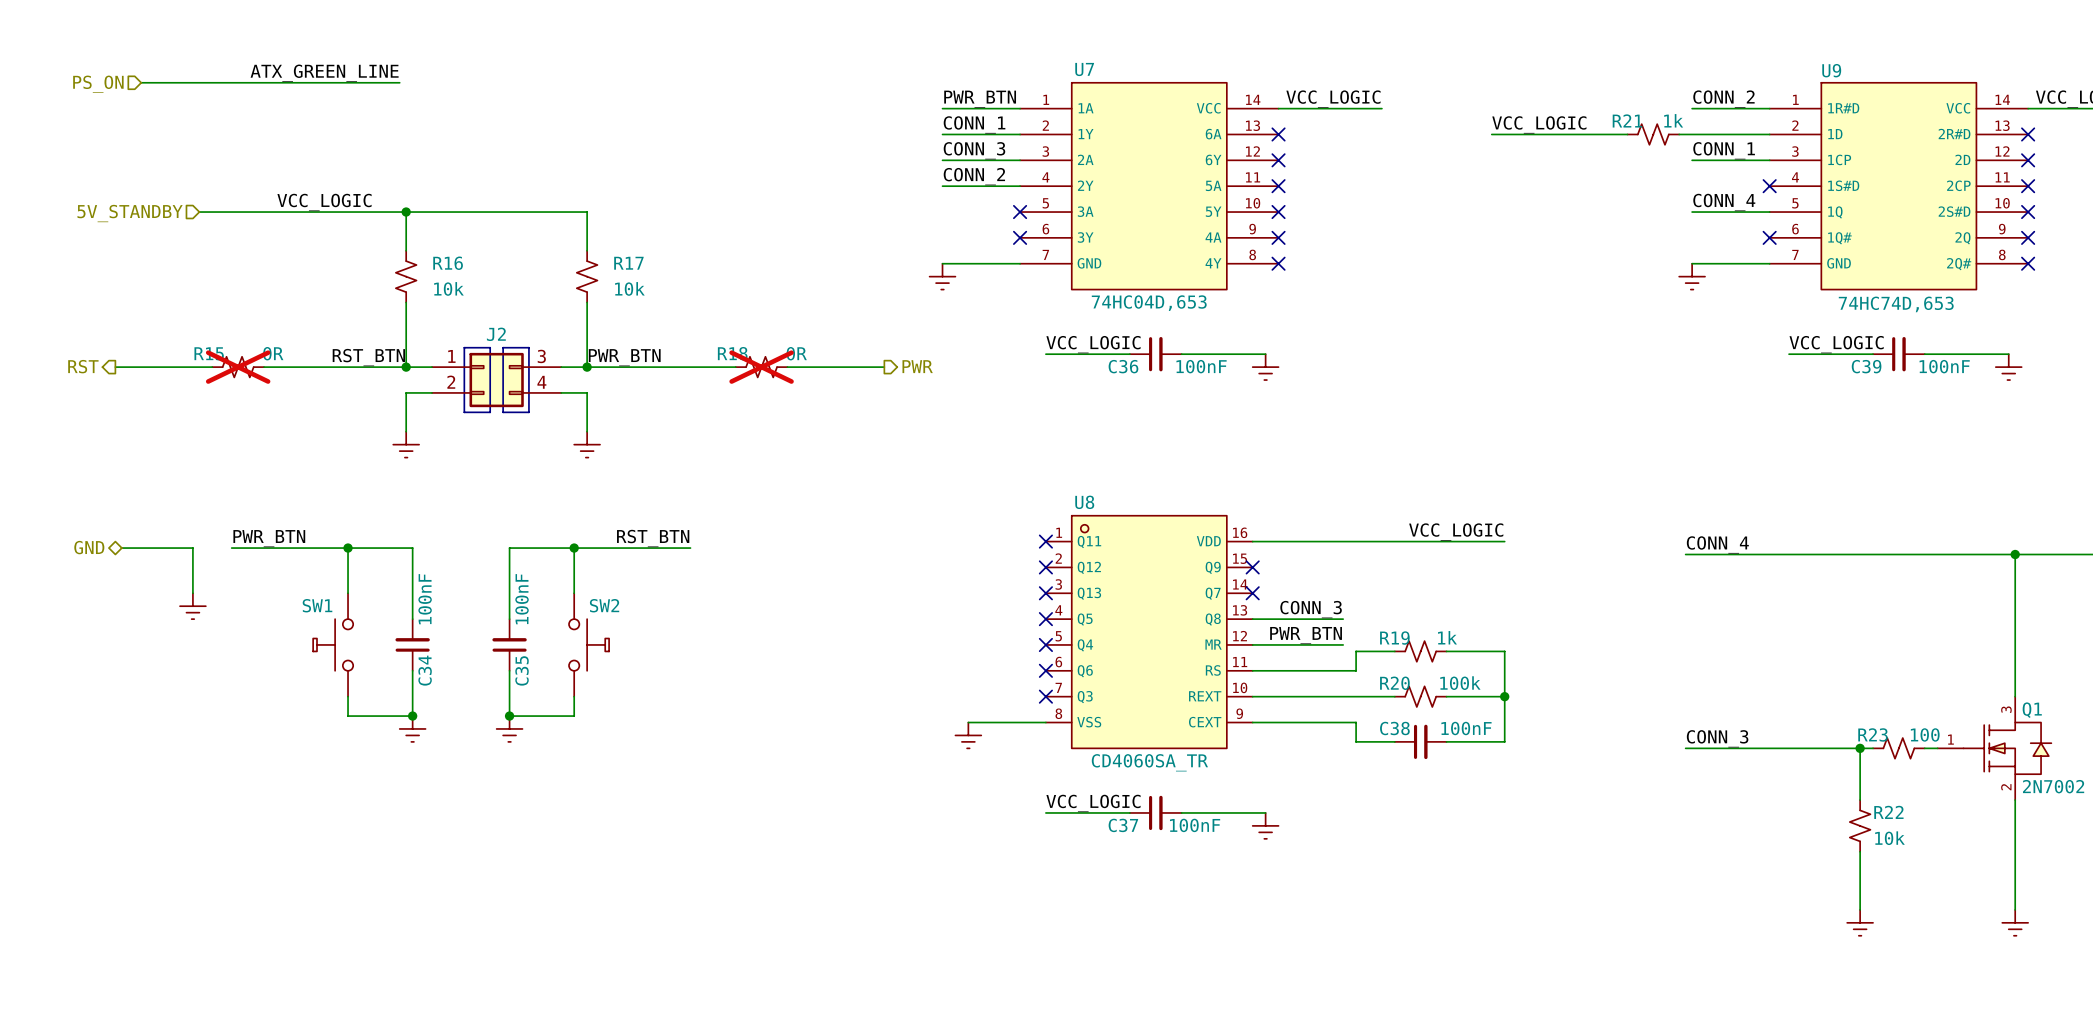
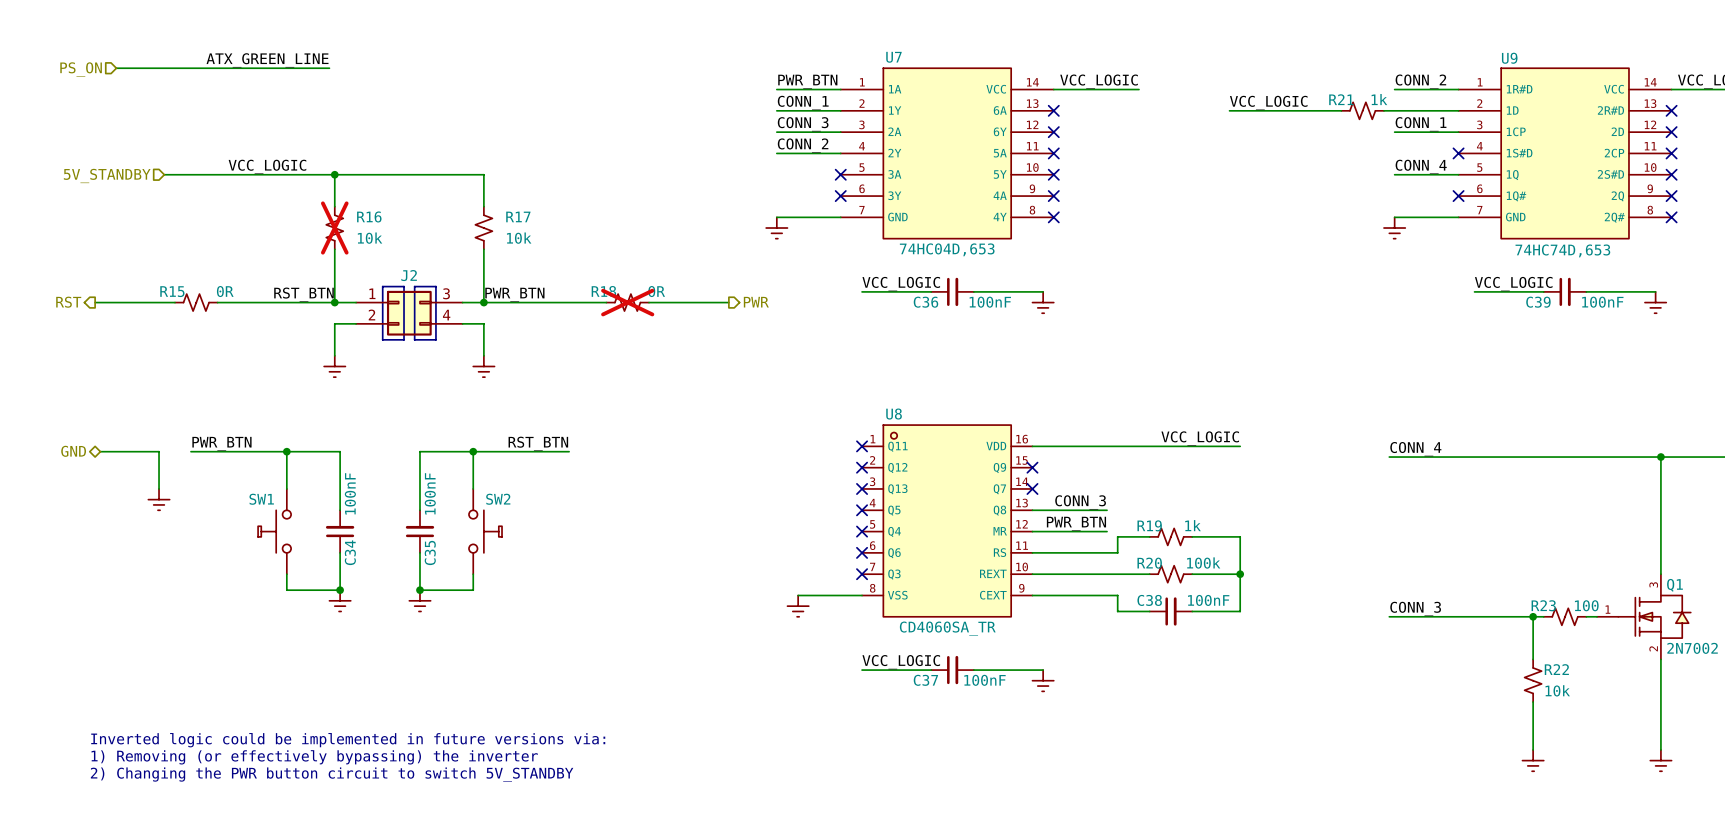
R16 do-not-place cross: none -> (334, 228)
R15 do-not-place cross: (238, 367) -> none
text: none -> Inverted logic could be implemented in future versions via: (348, 740)
text: none -> 1) Removing (or effectively bypassing) the inverter (314, 757)
text: none -> 2) Changing the PWR button circuit to switch 5V_STANDBY (332, 774)

